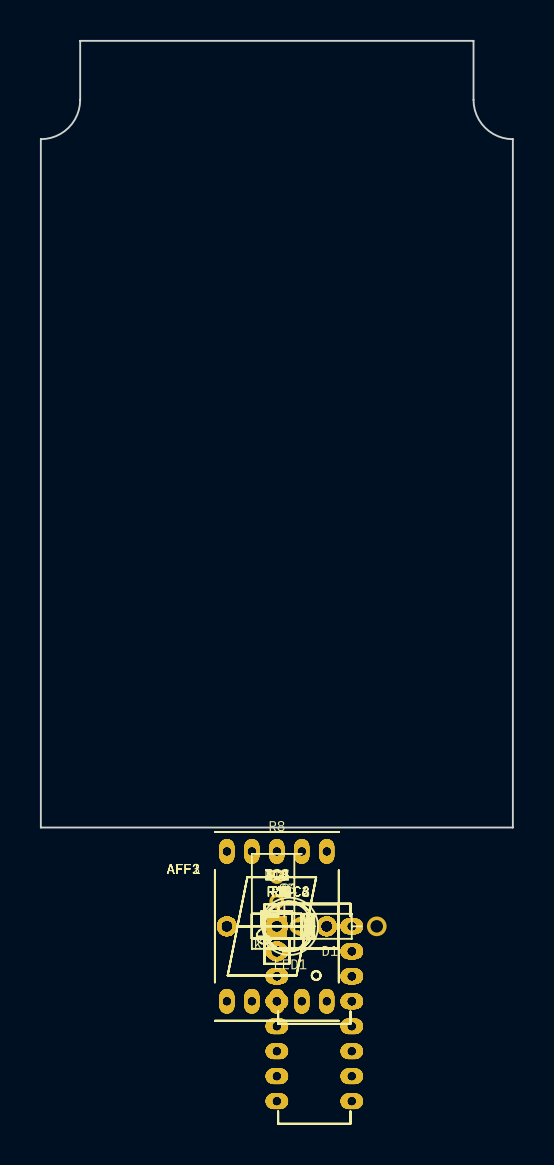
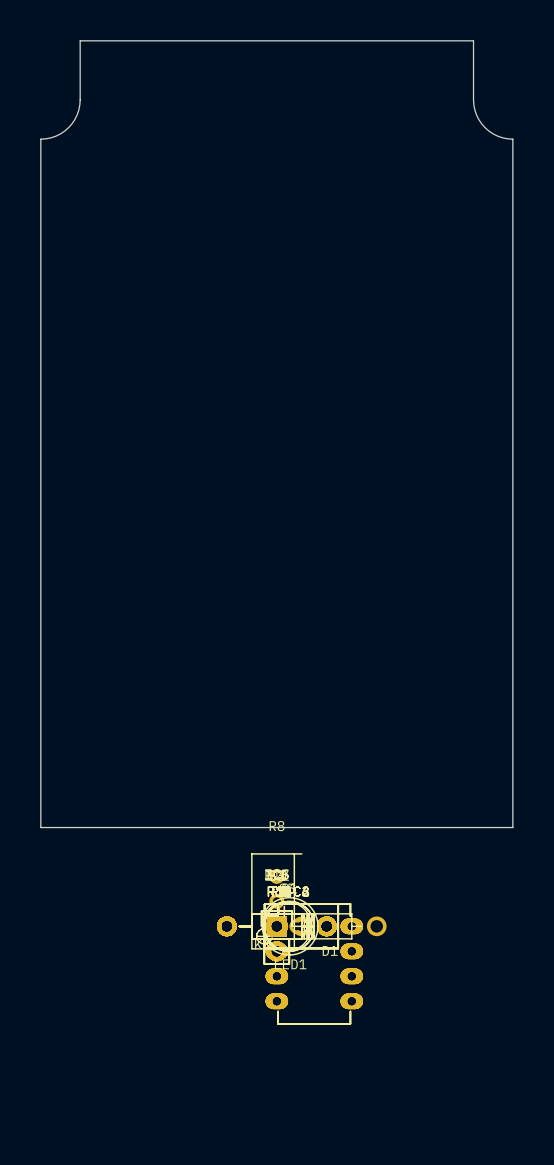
part: (276, 926) -> none
part: (276, 926) -> none
part: (276, 926) -> none
part: (313, 1013) -> none
part: (313, 1013) -> none
part: (313, 1013) -> none

